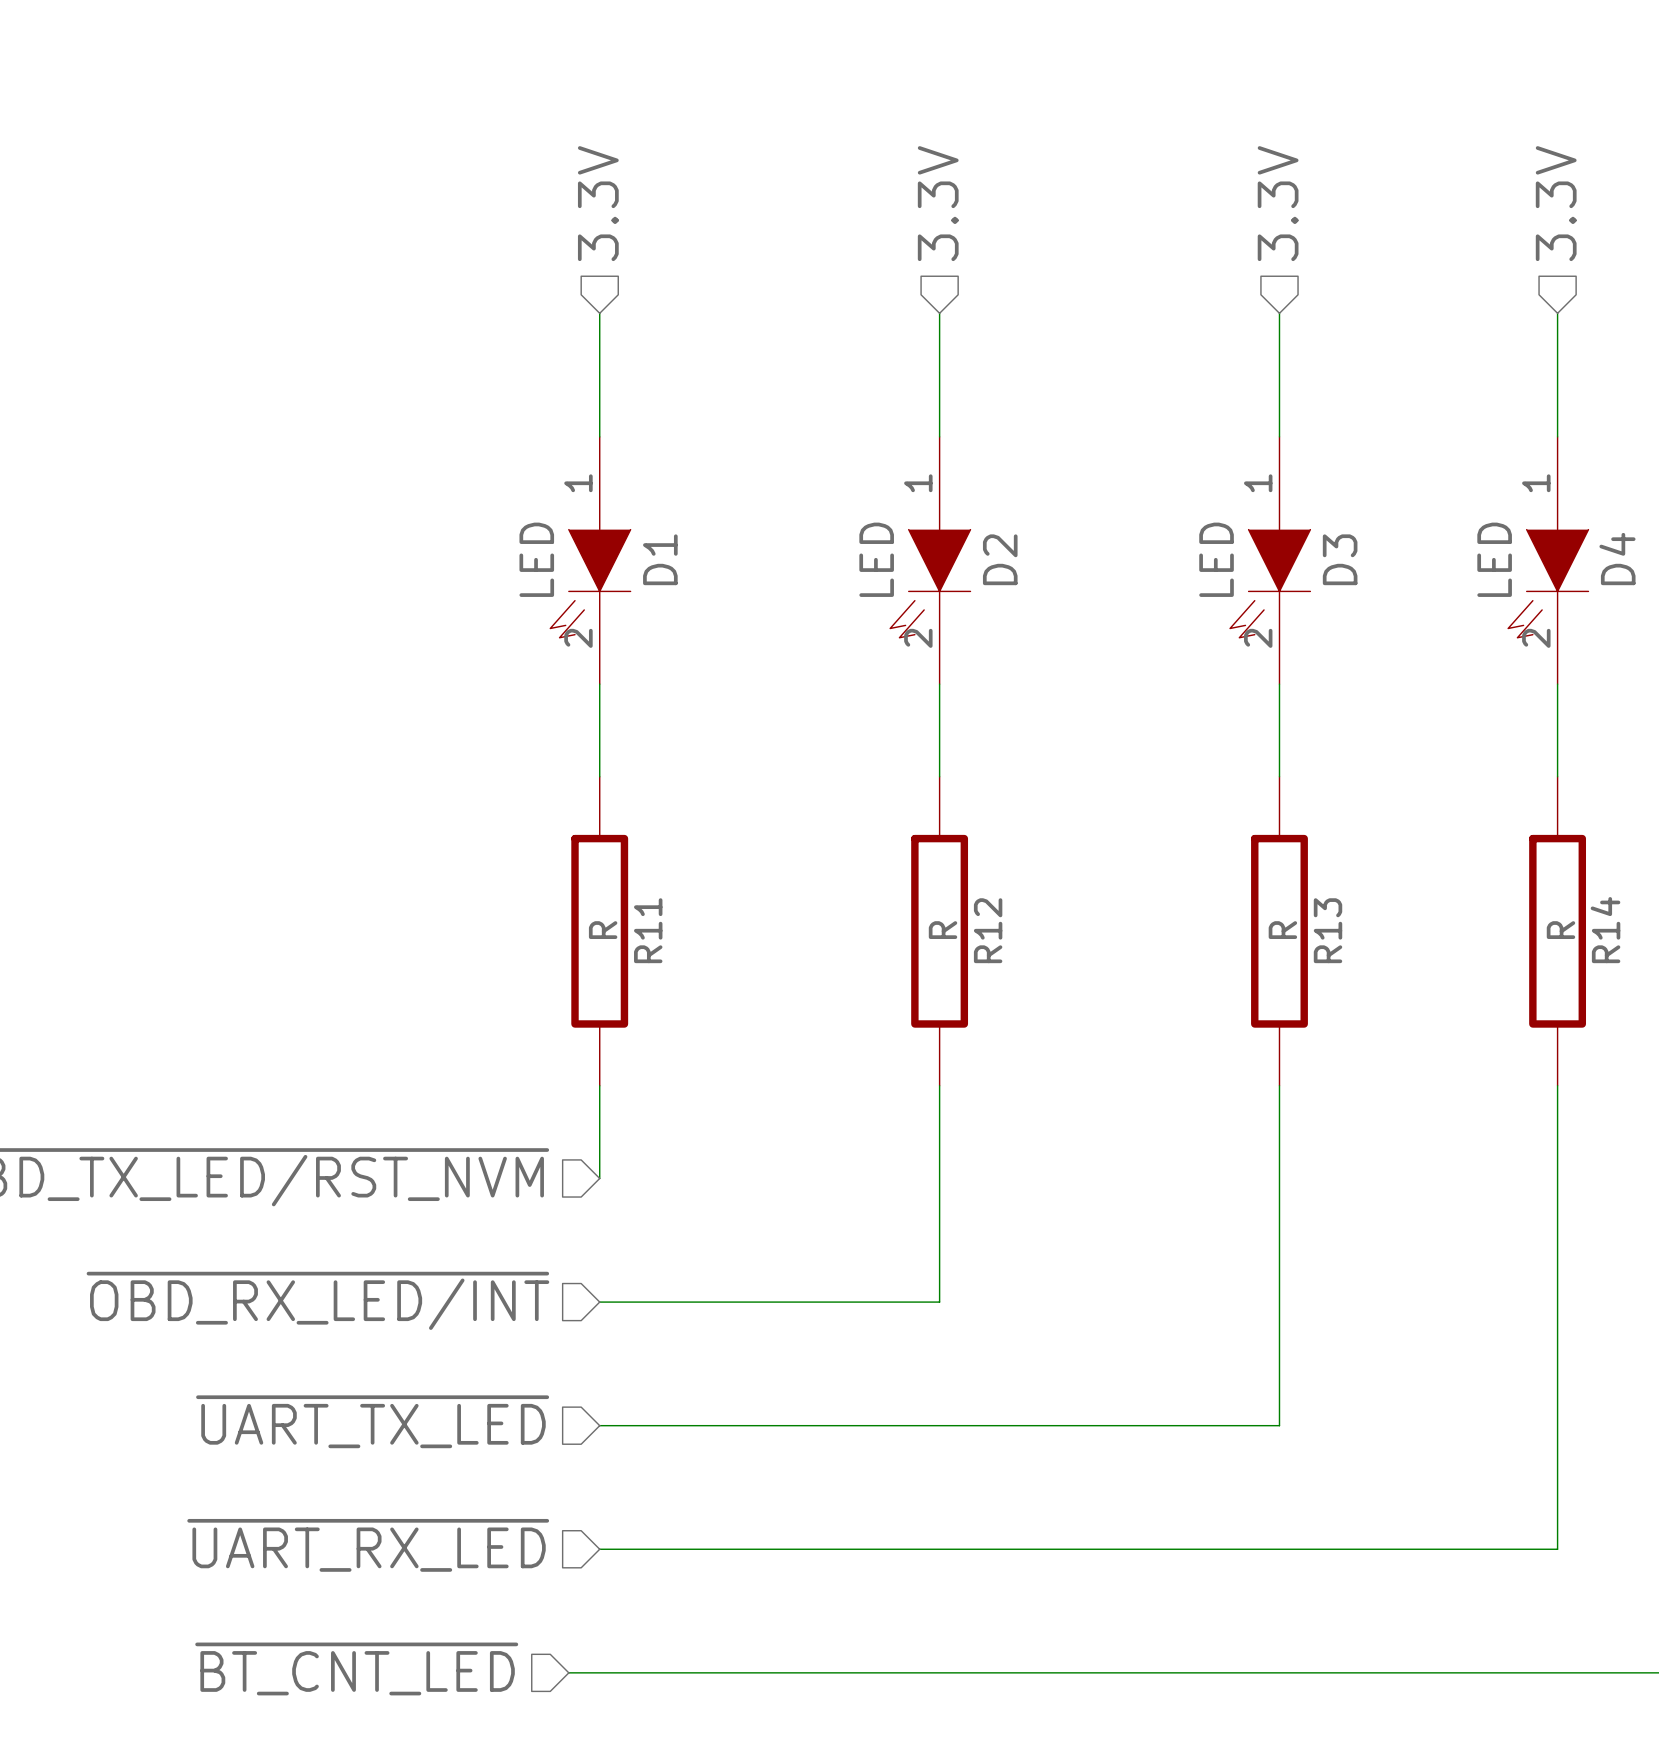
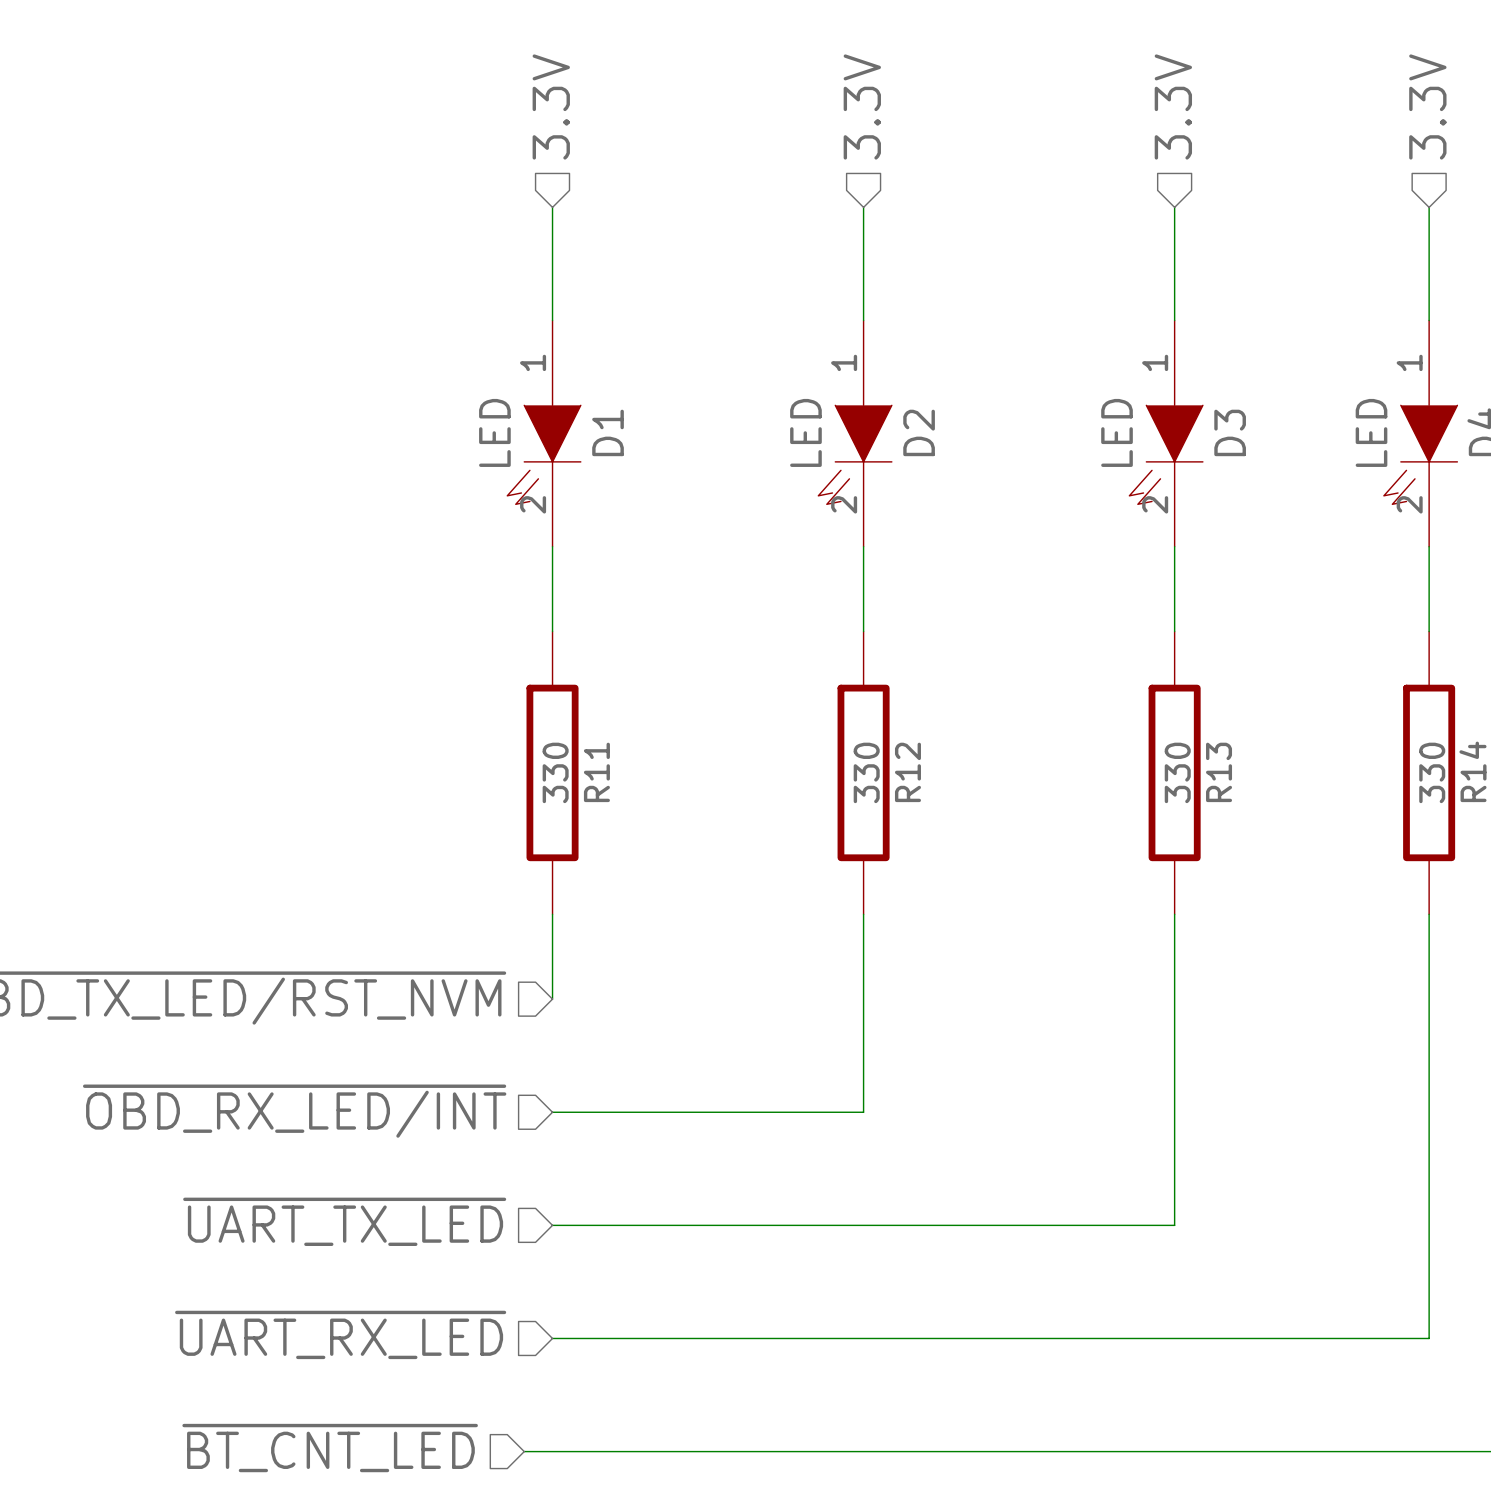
R11 value: R (603, 930) -> 330 (555, 772)
R12 value: R (943, 930) -> 330 (866, 772)
R13 value: R (1282, 930) -> 330 (1177, 772)
R14 value: R (1560, 930) -> 330 (1432, 772)

